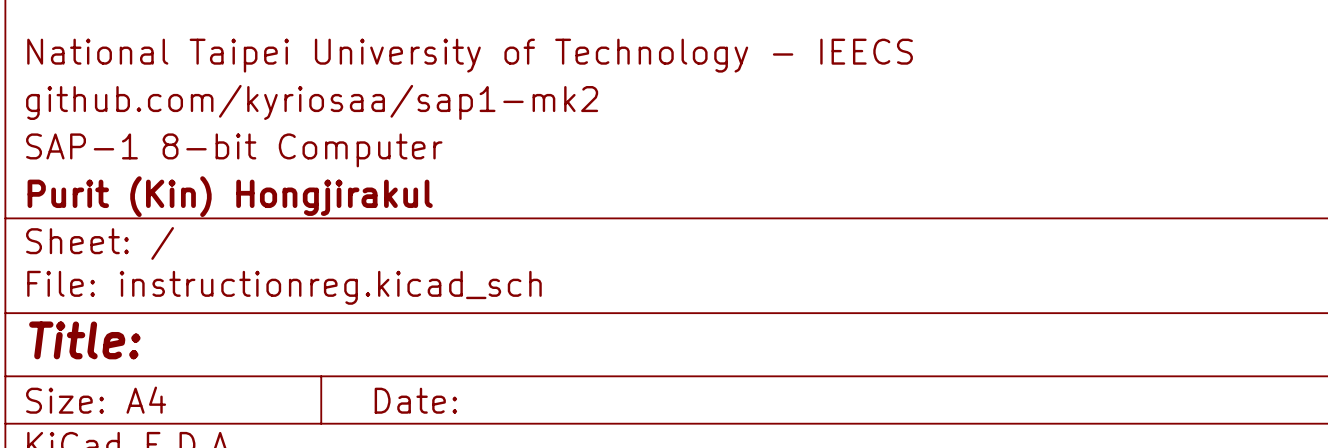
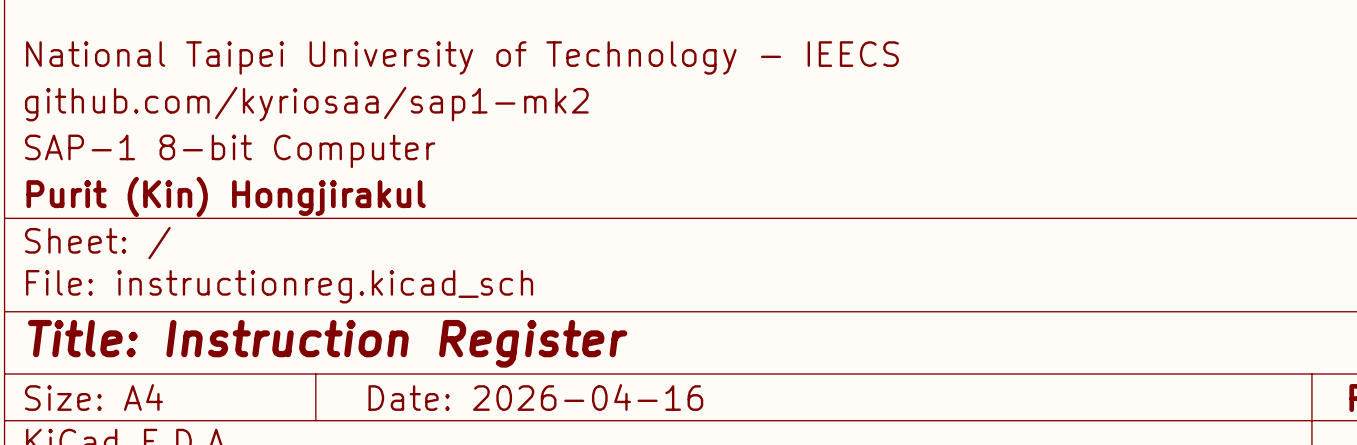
title block: Title: (84, 340) -> Title: Instruction Register (327, 343)
title block: Date: (415, 400) -> Date: 2026-04-16 (535, 397)

